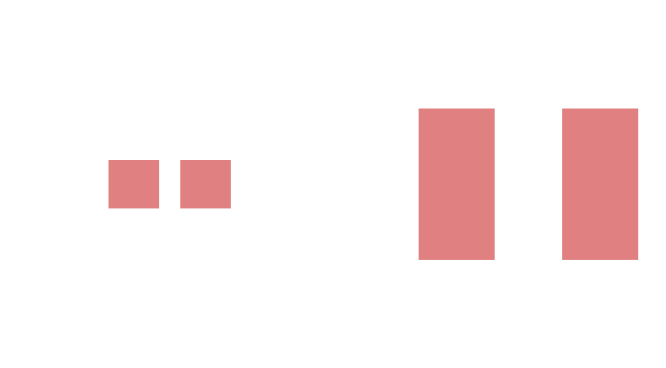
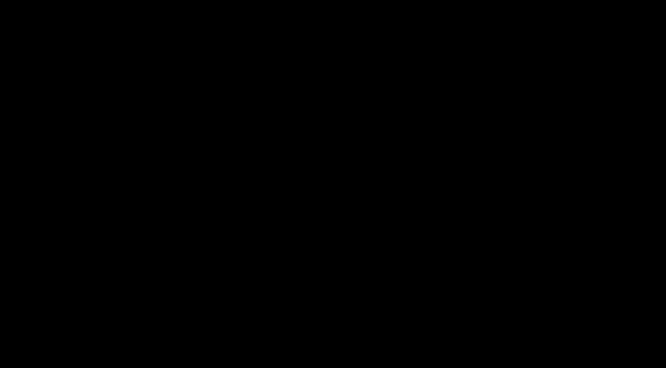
part: (169, 184) -> none
part: (528, 184) -> none

